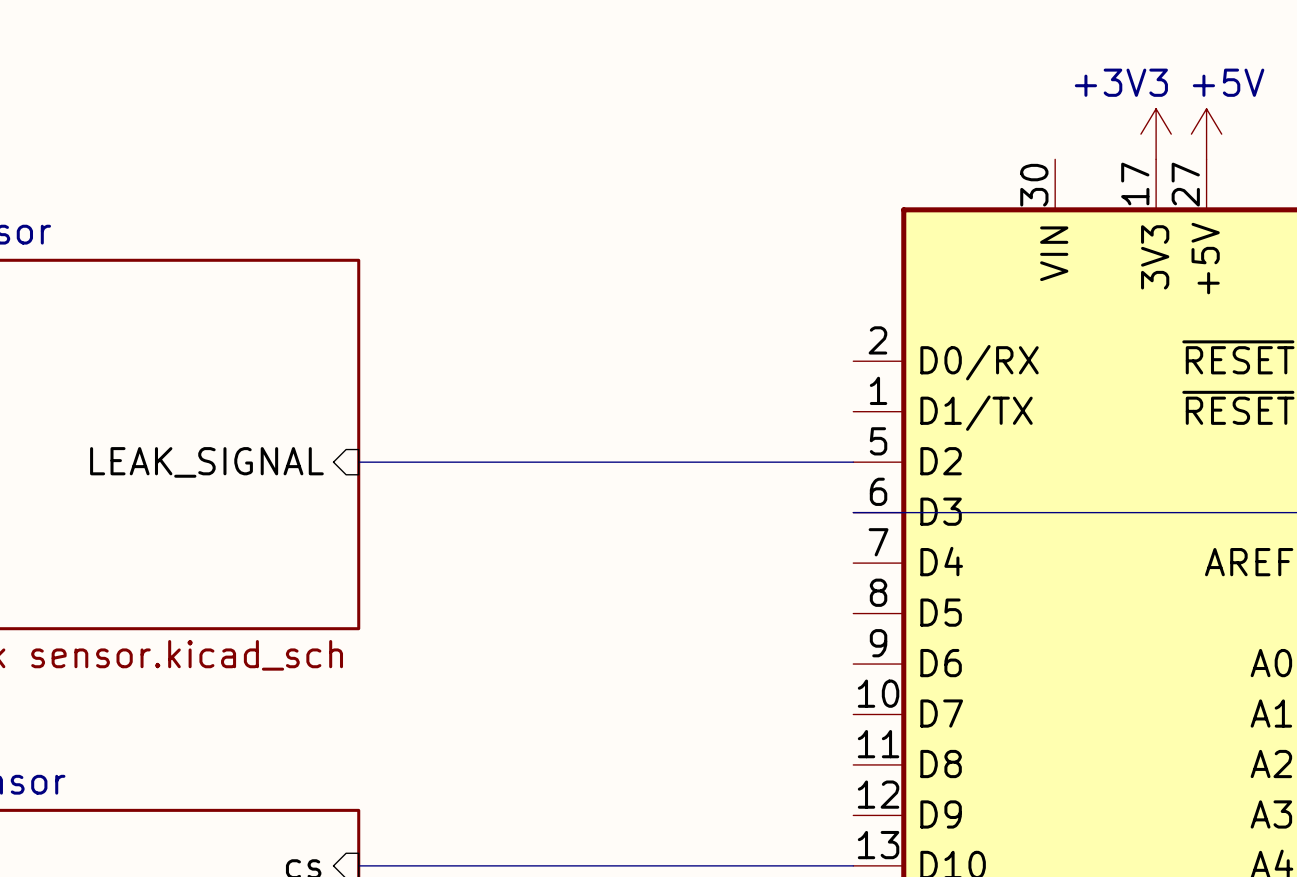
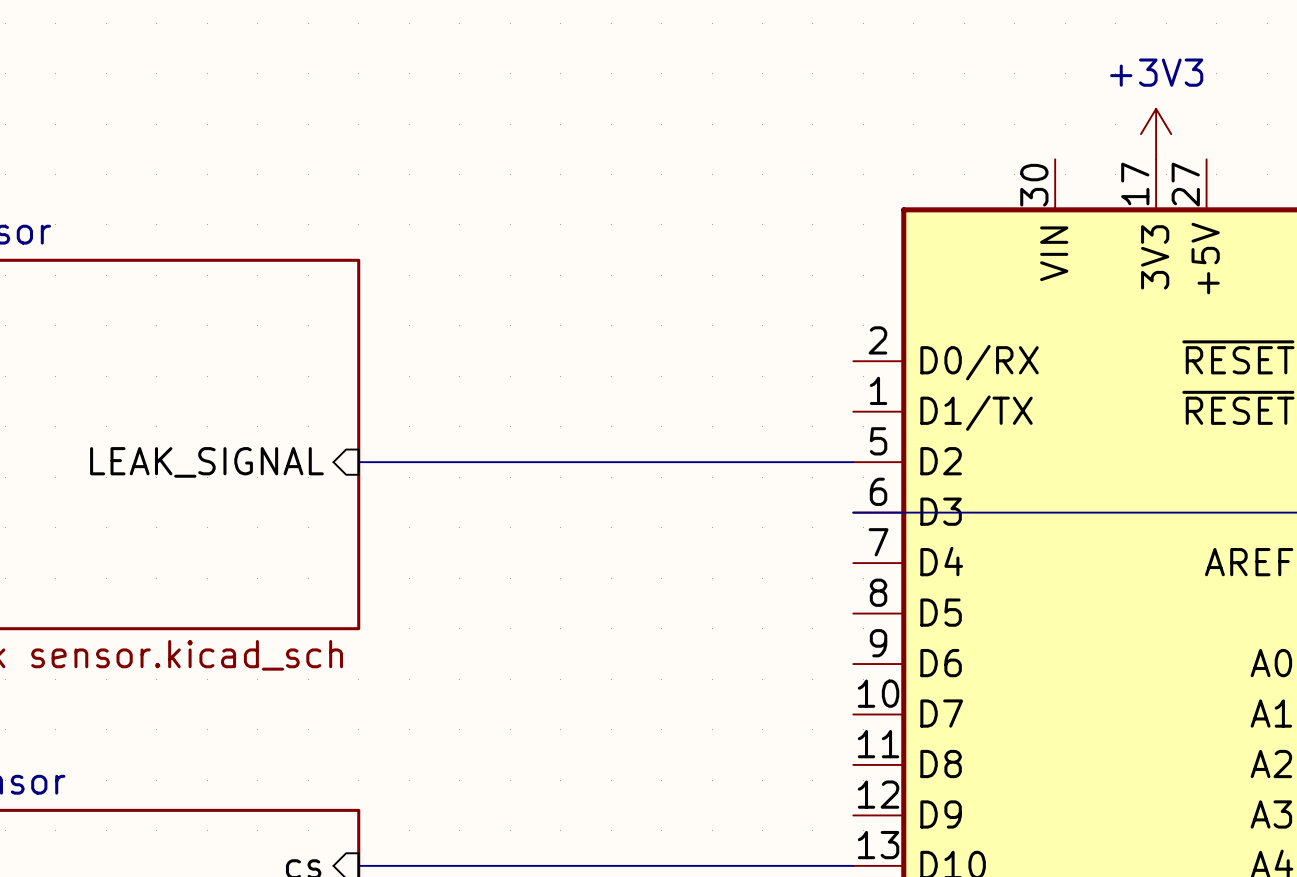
power symbol text position: +3V3 (1121, 82) -> +3V3 (1156, 72)
power symbol: +5V (1206, 134) -> none

